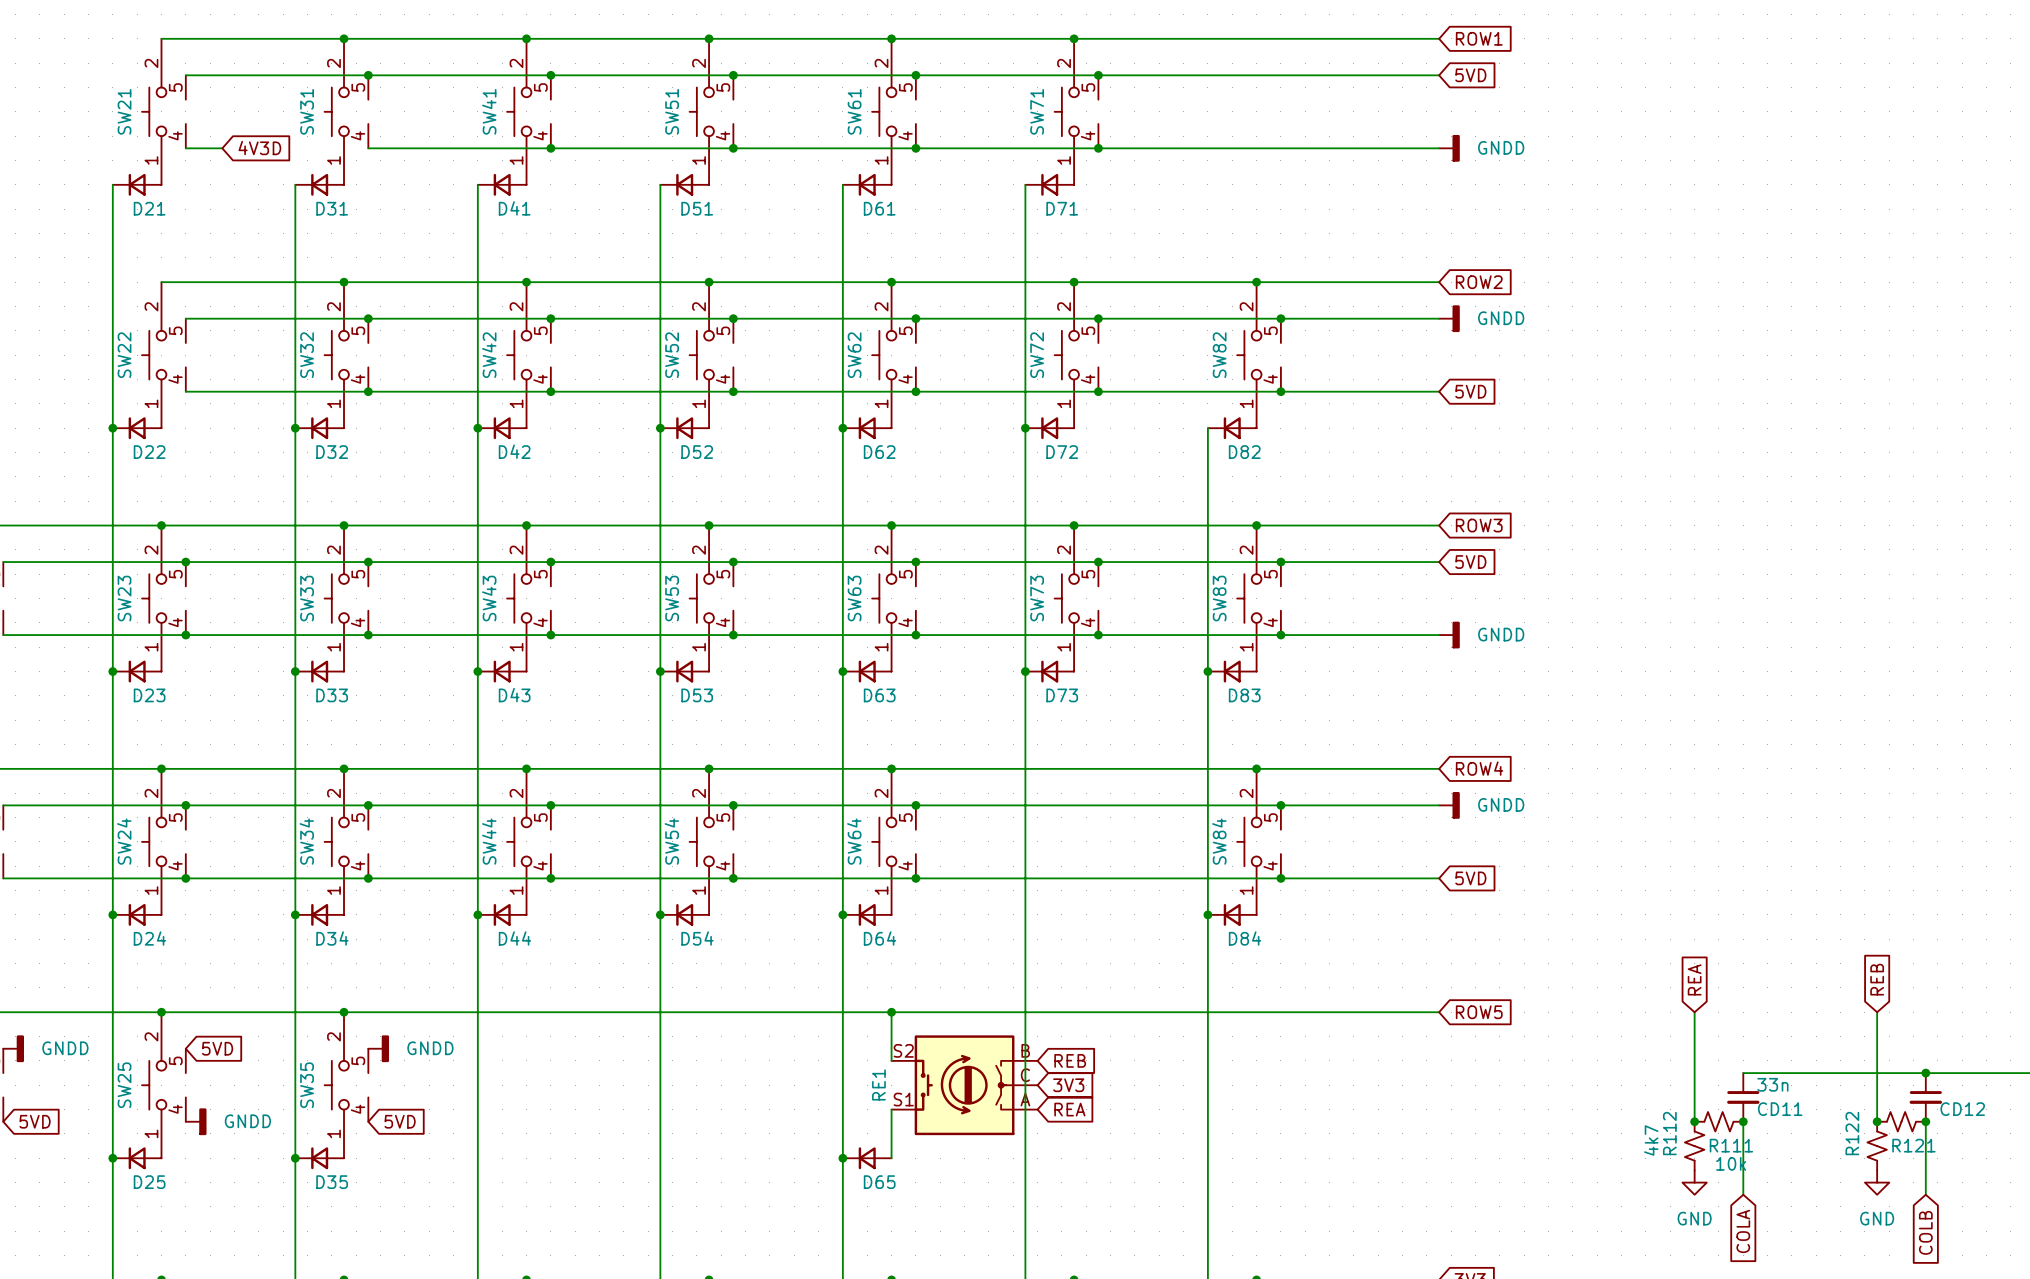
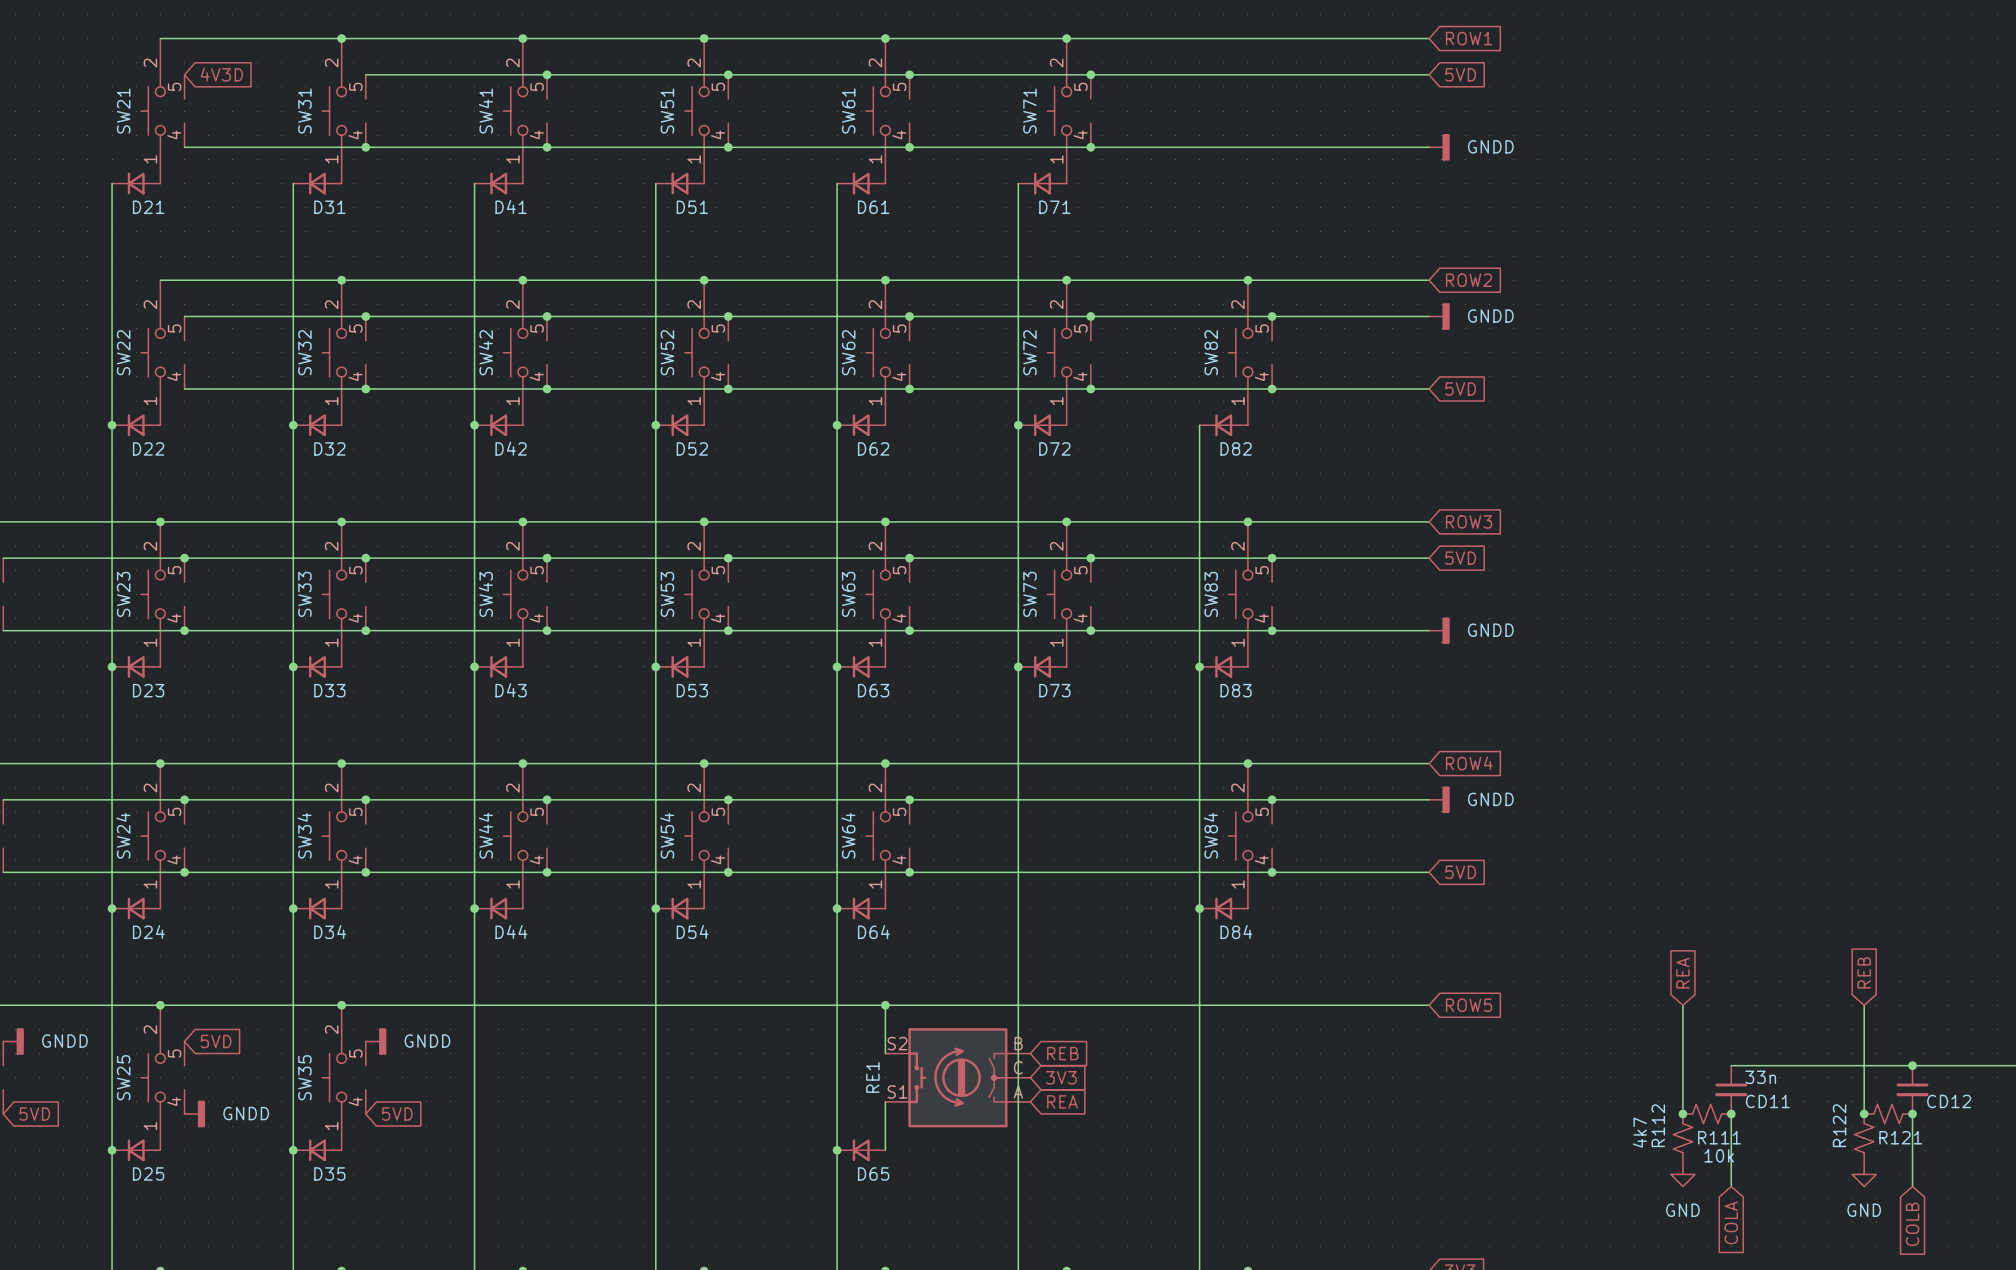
wire: (185, 75) (368, 75) -> none
junction: (368, 75) -> none
wire: none -> (220, 147) (365, 147)
global label position: 4V3D (259, 148) -> 4V3D (221, 74)
junction: none -> (365, 147)

